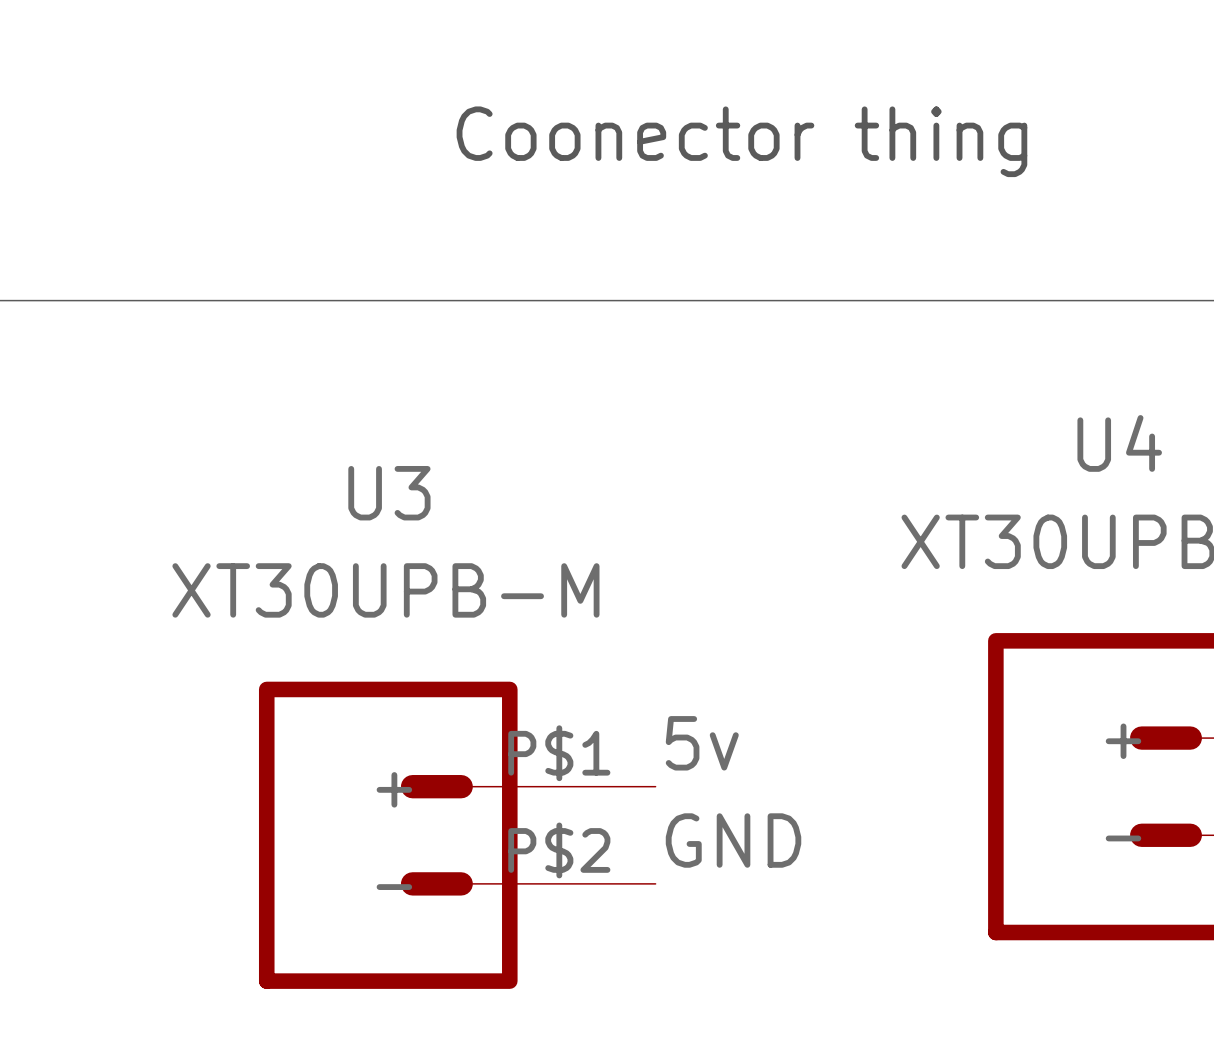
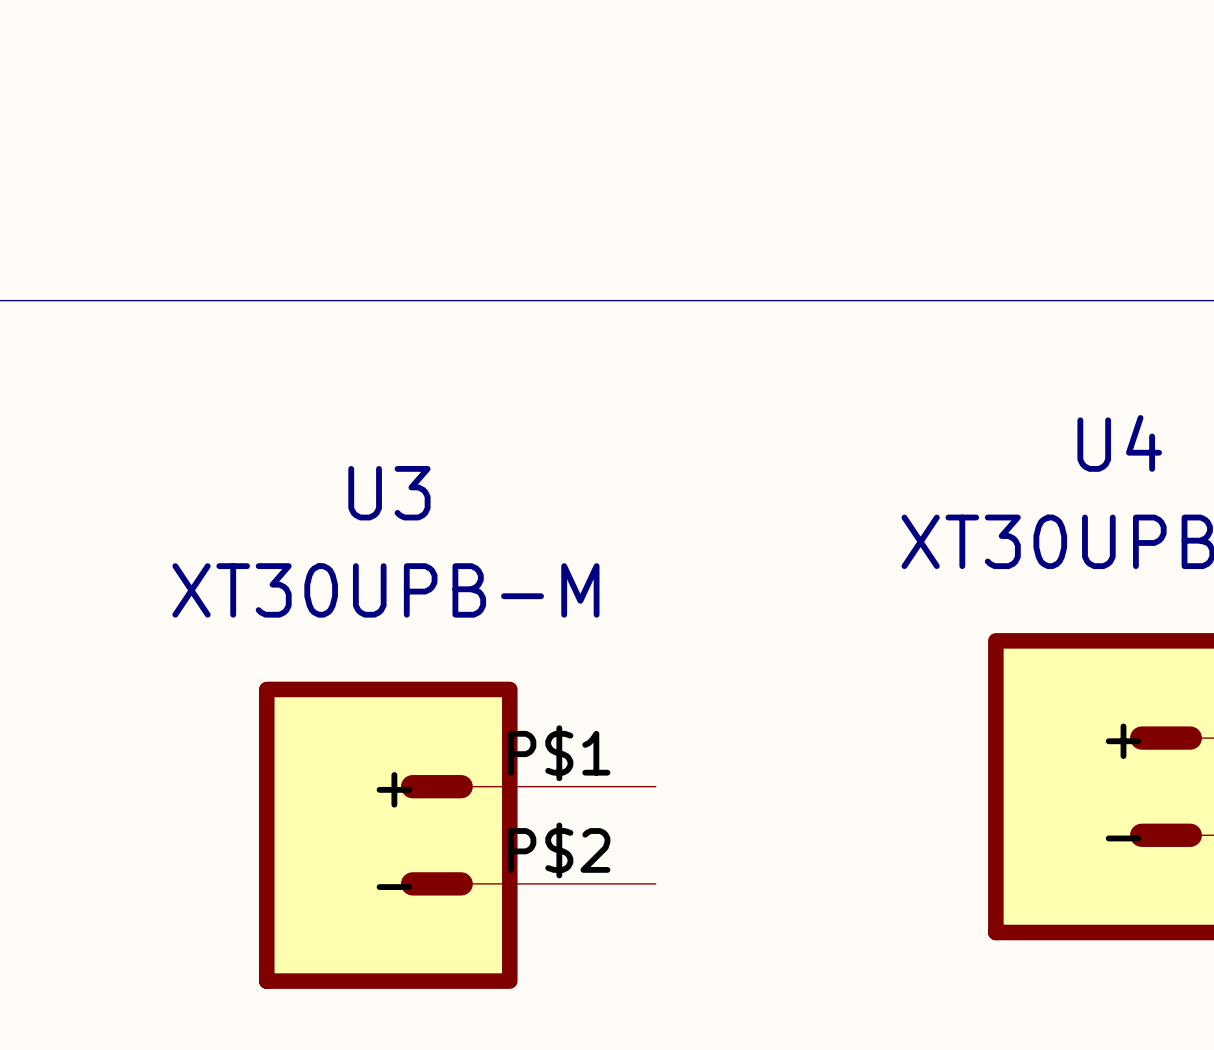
text: Coonector thing (741, 141) -> none
label: 5v (702, 743) -> none
label: GND (733, 840) -> none

